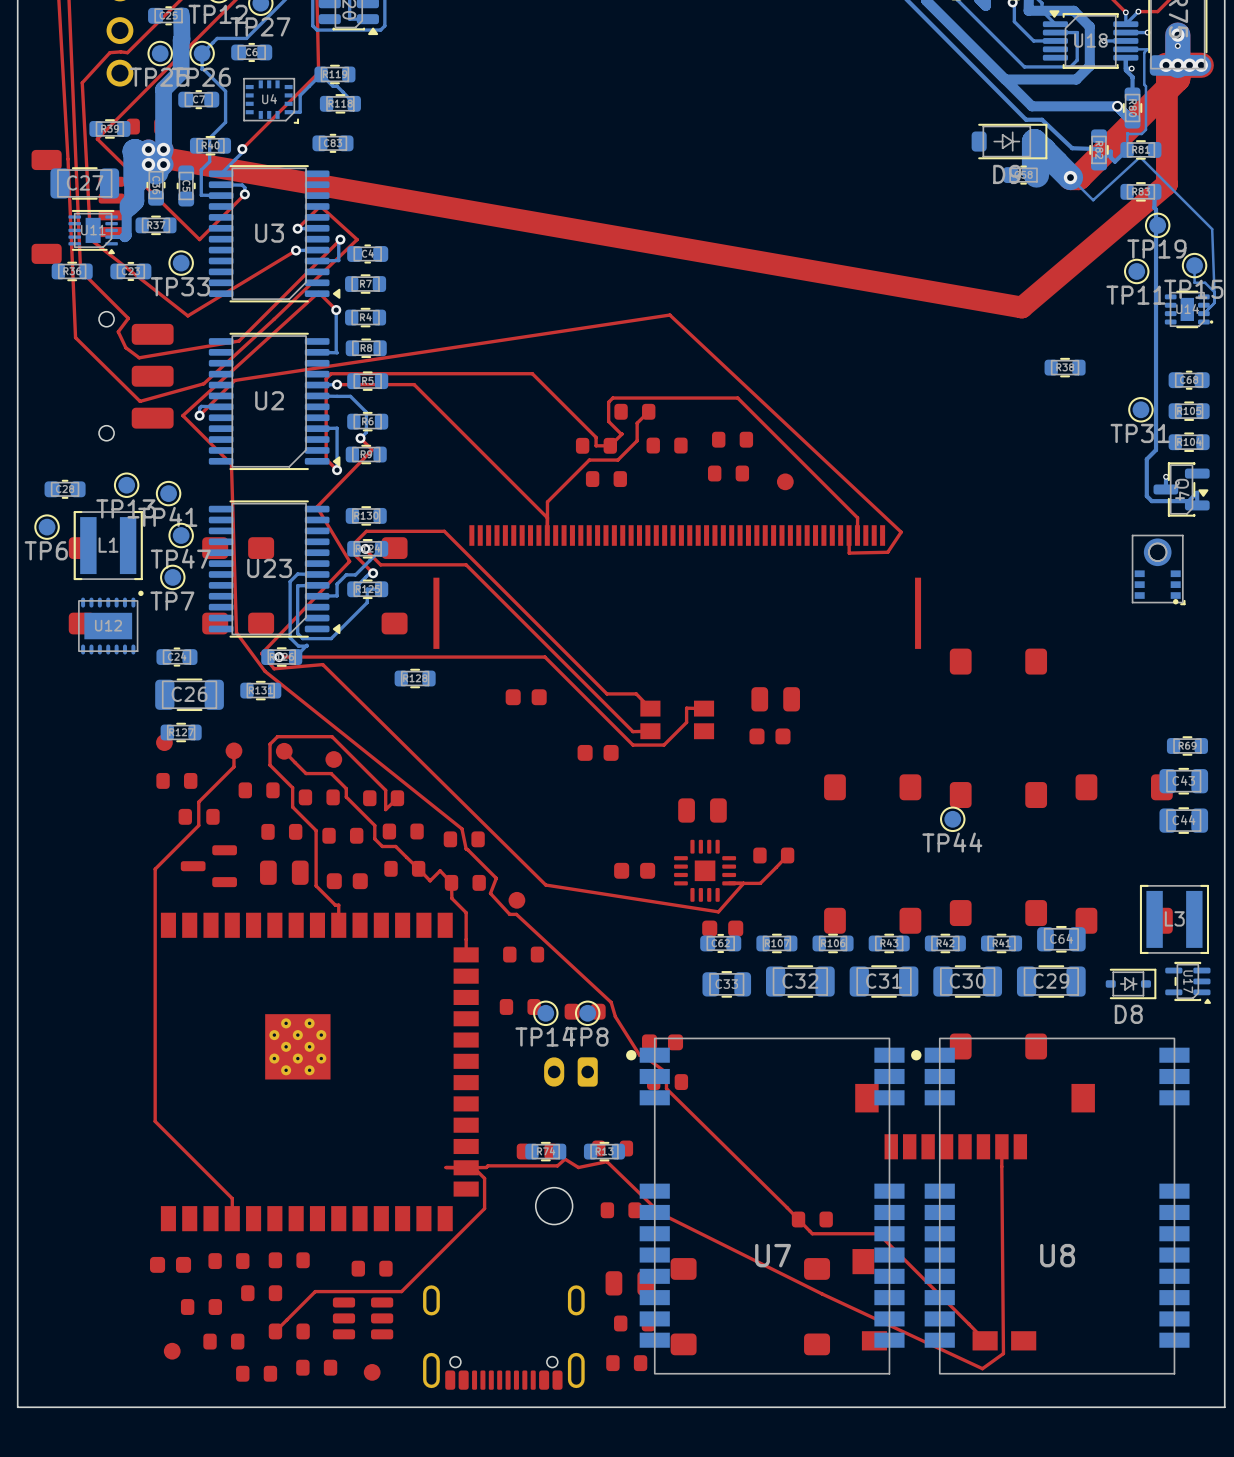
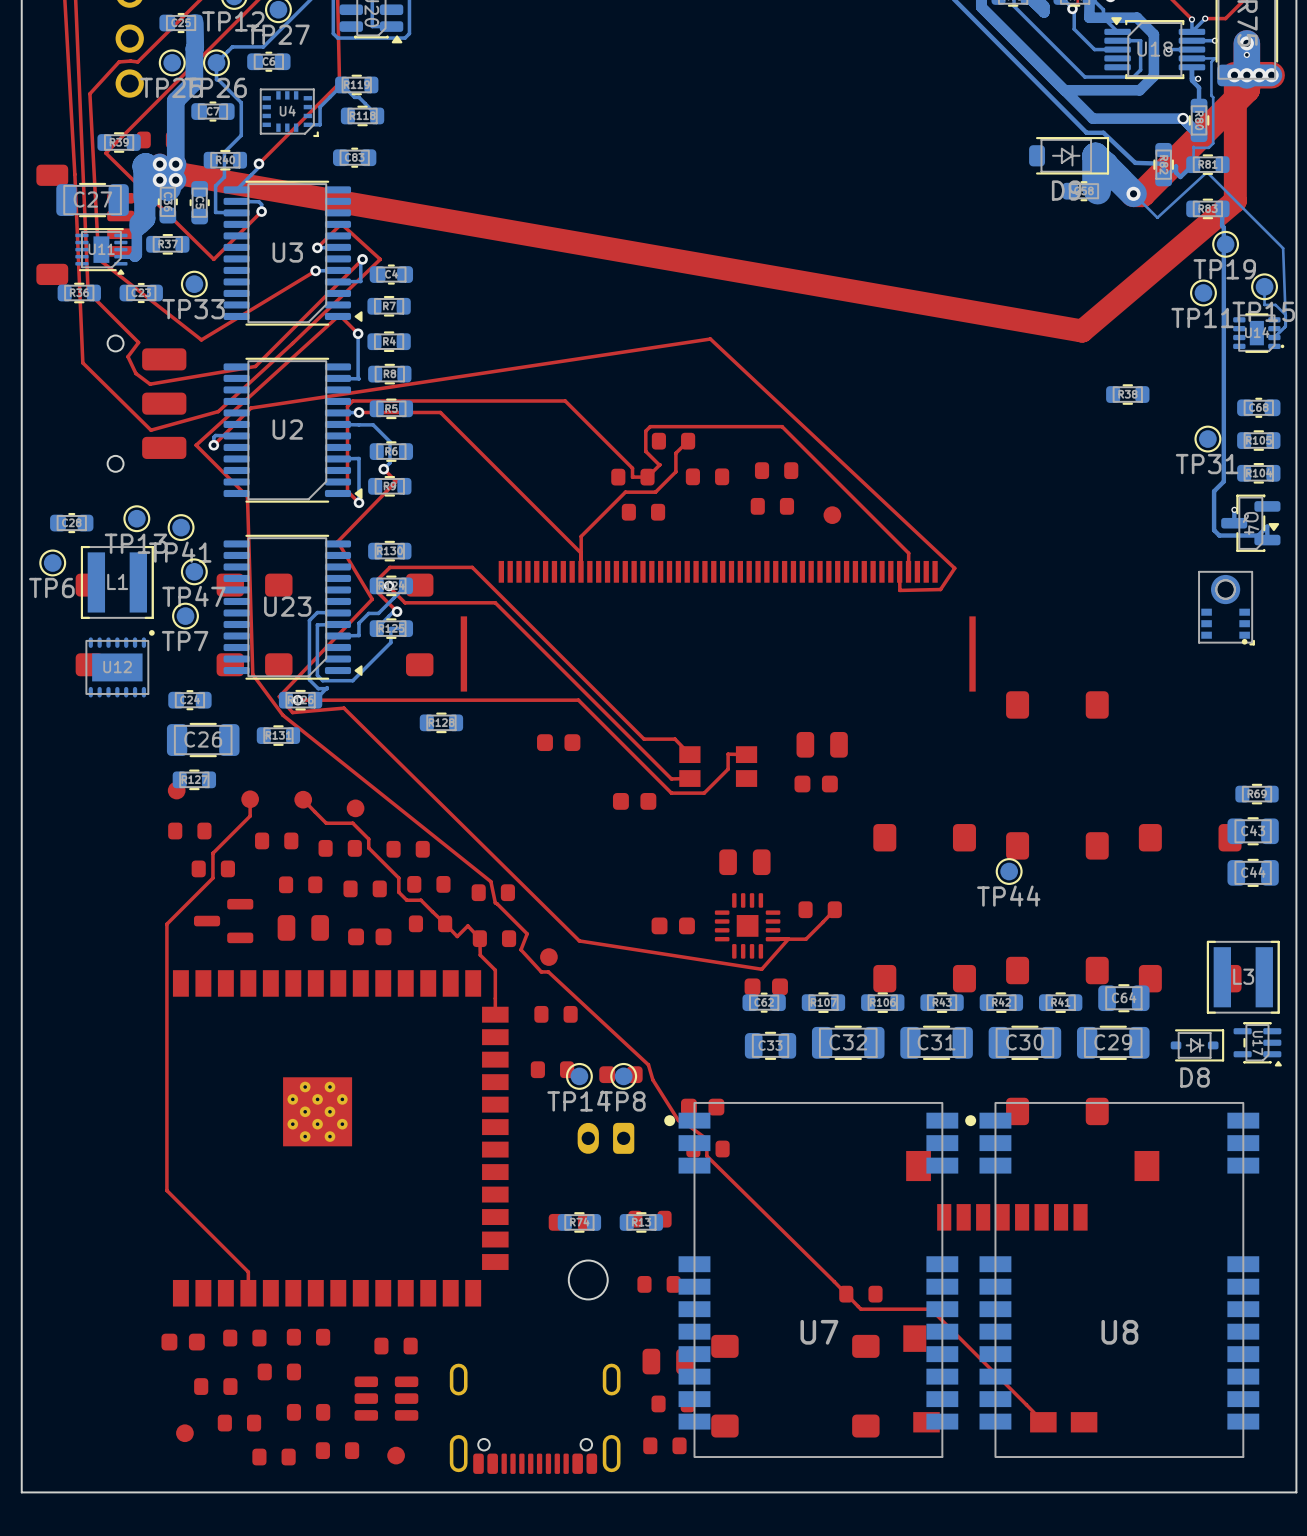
top track: (397, 798) (385, 809) (385, 790) (332, 736) (277, 736) (270, 744) (270, 765) (292, 787) (292, 807) (316, 830) (316, 885) (335, 905) (338, 905) (338, 925) -> none
top track: (1001, 1146) (1003, 1353) (982, 1368) (822, 1294) (660, 1213) (606, 1161) (578, 1167) (565, 1159) (557, 1165) (446, 1167) (473, 1167) (484, 1178) (484, 1208) (401, 1291) (315, 1291) (275, 1331) -> none

